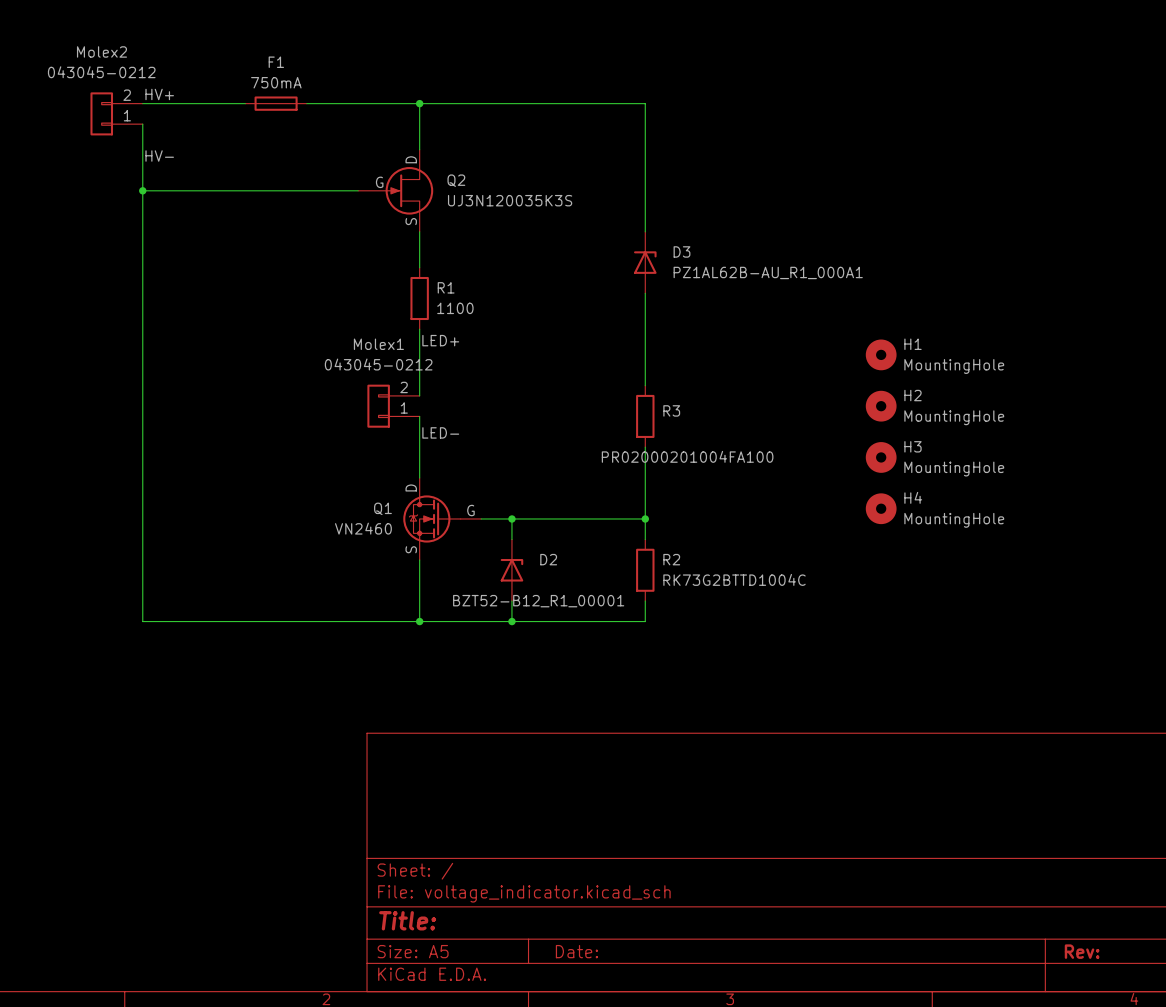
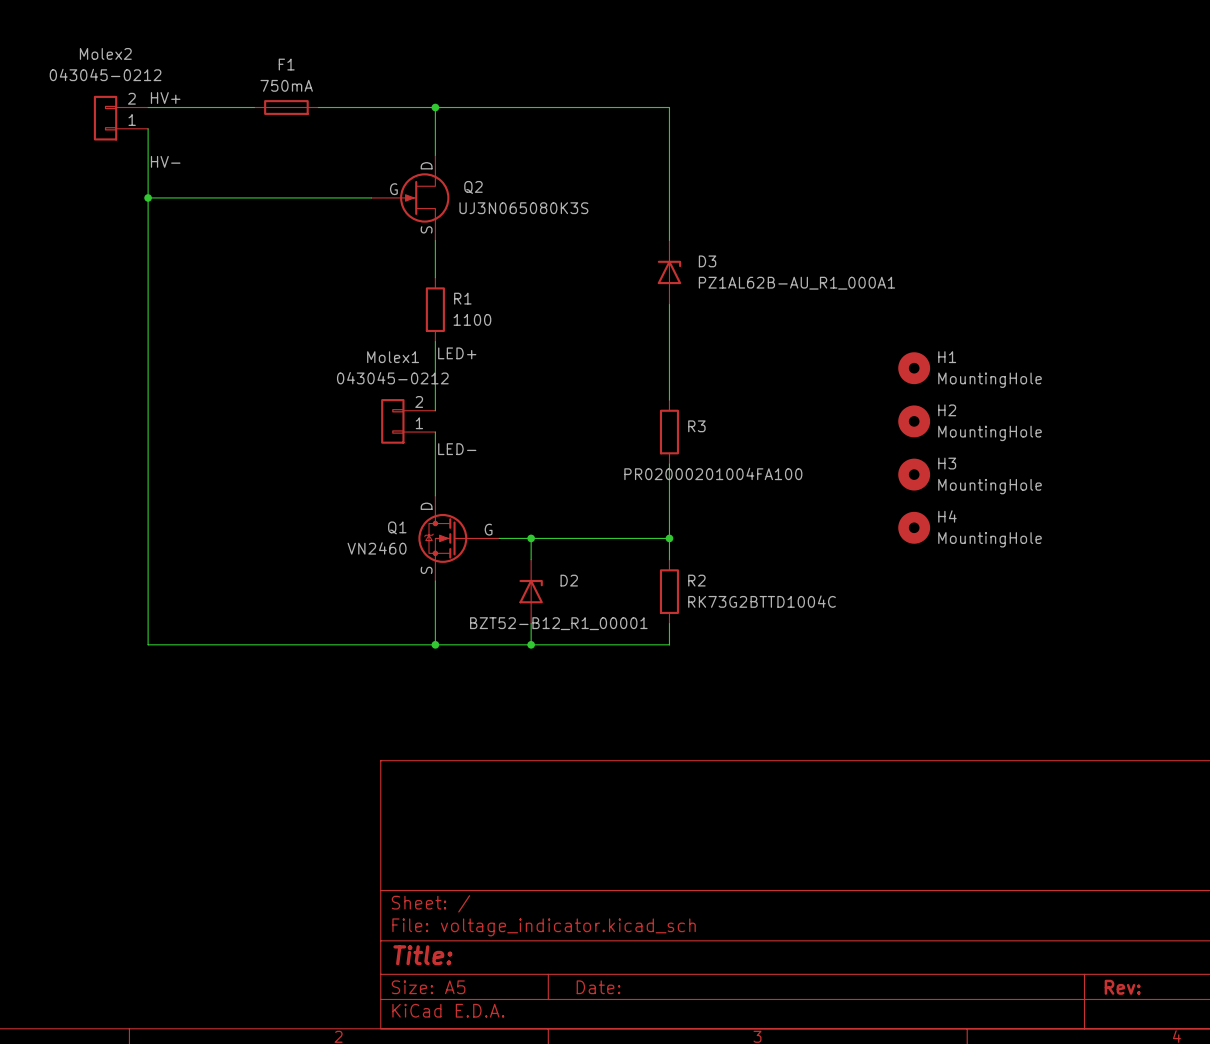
Q2 value: UJ3N120035K3S (510, 200) -> UJ3N065080K3S (523, 208)

